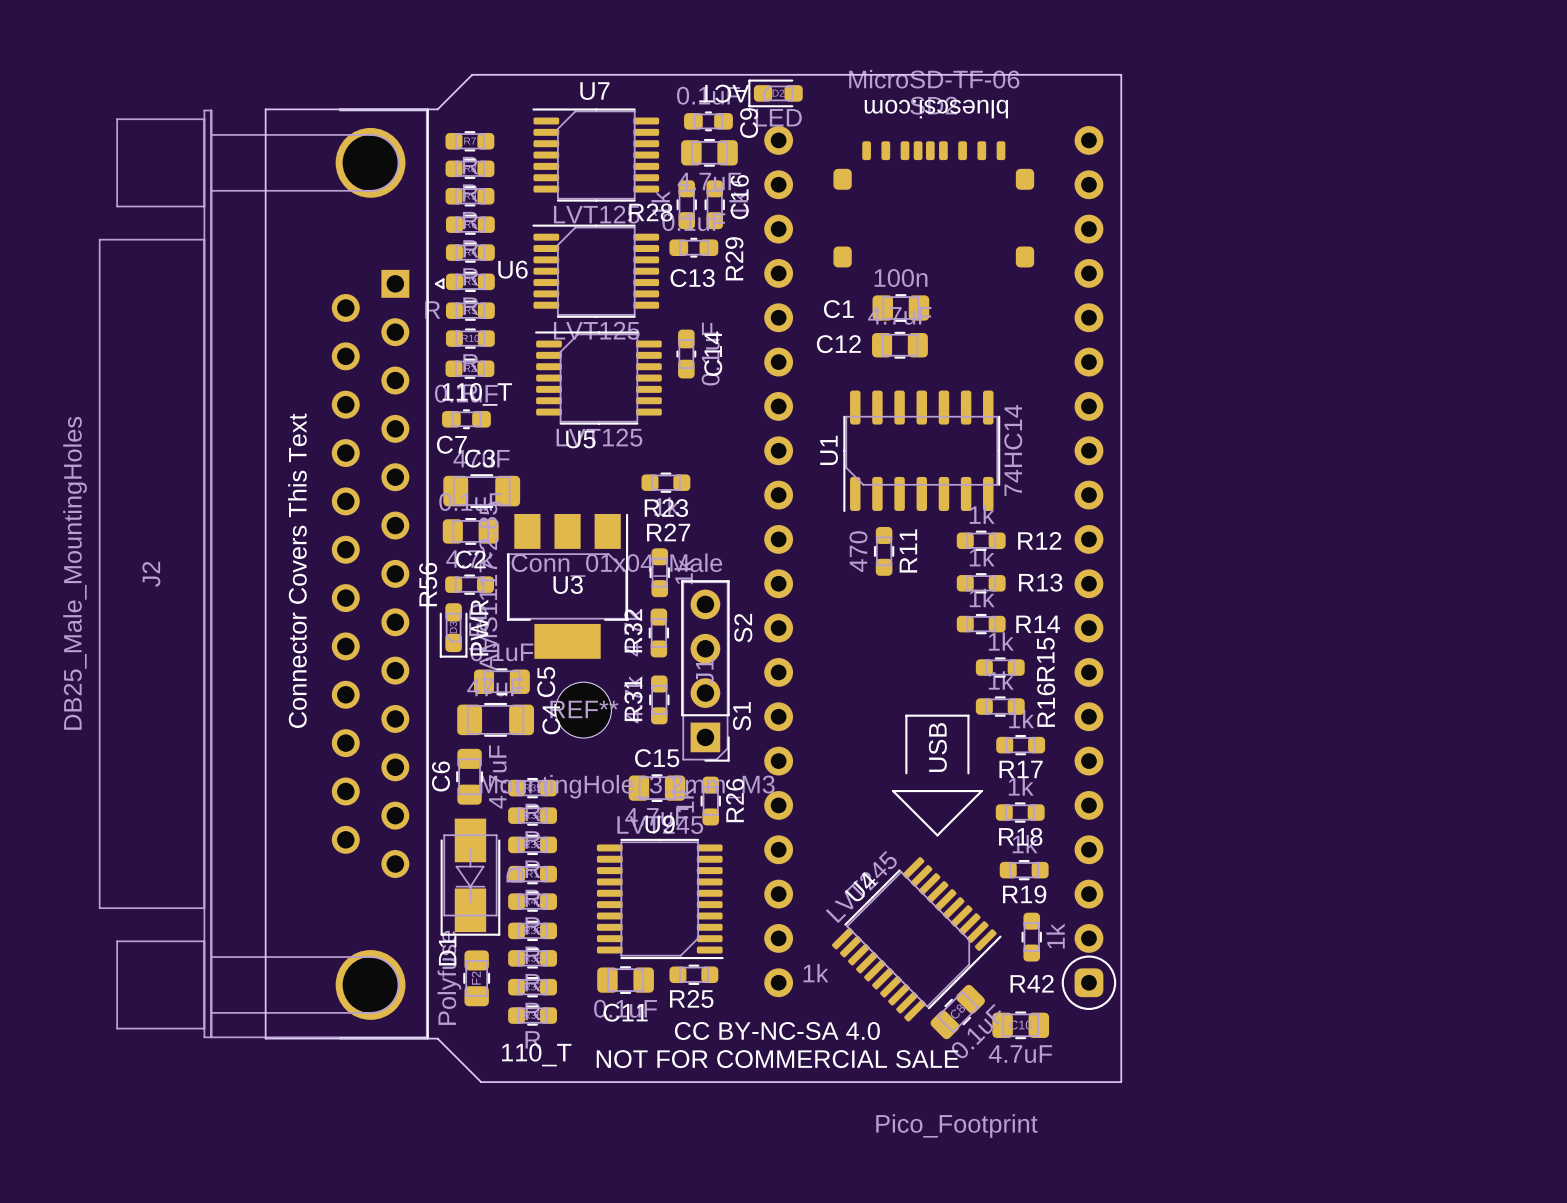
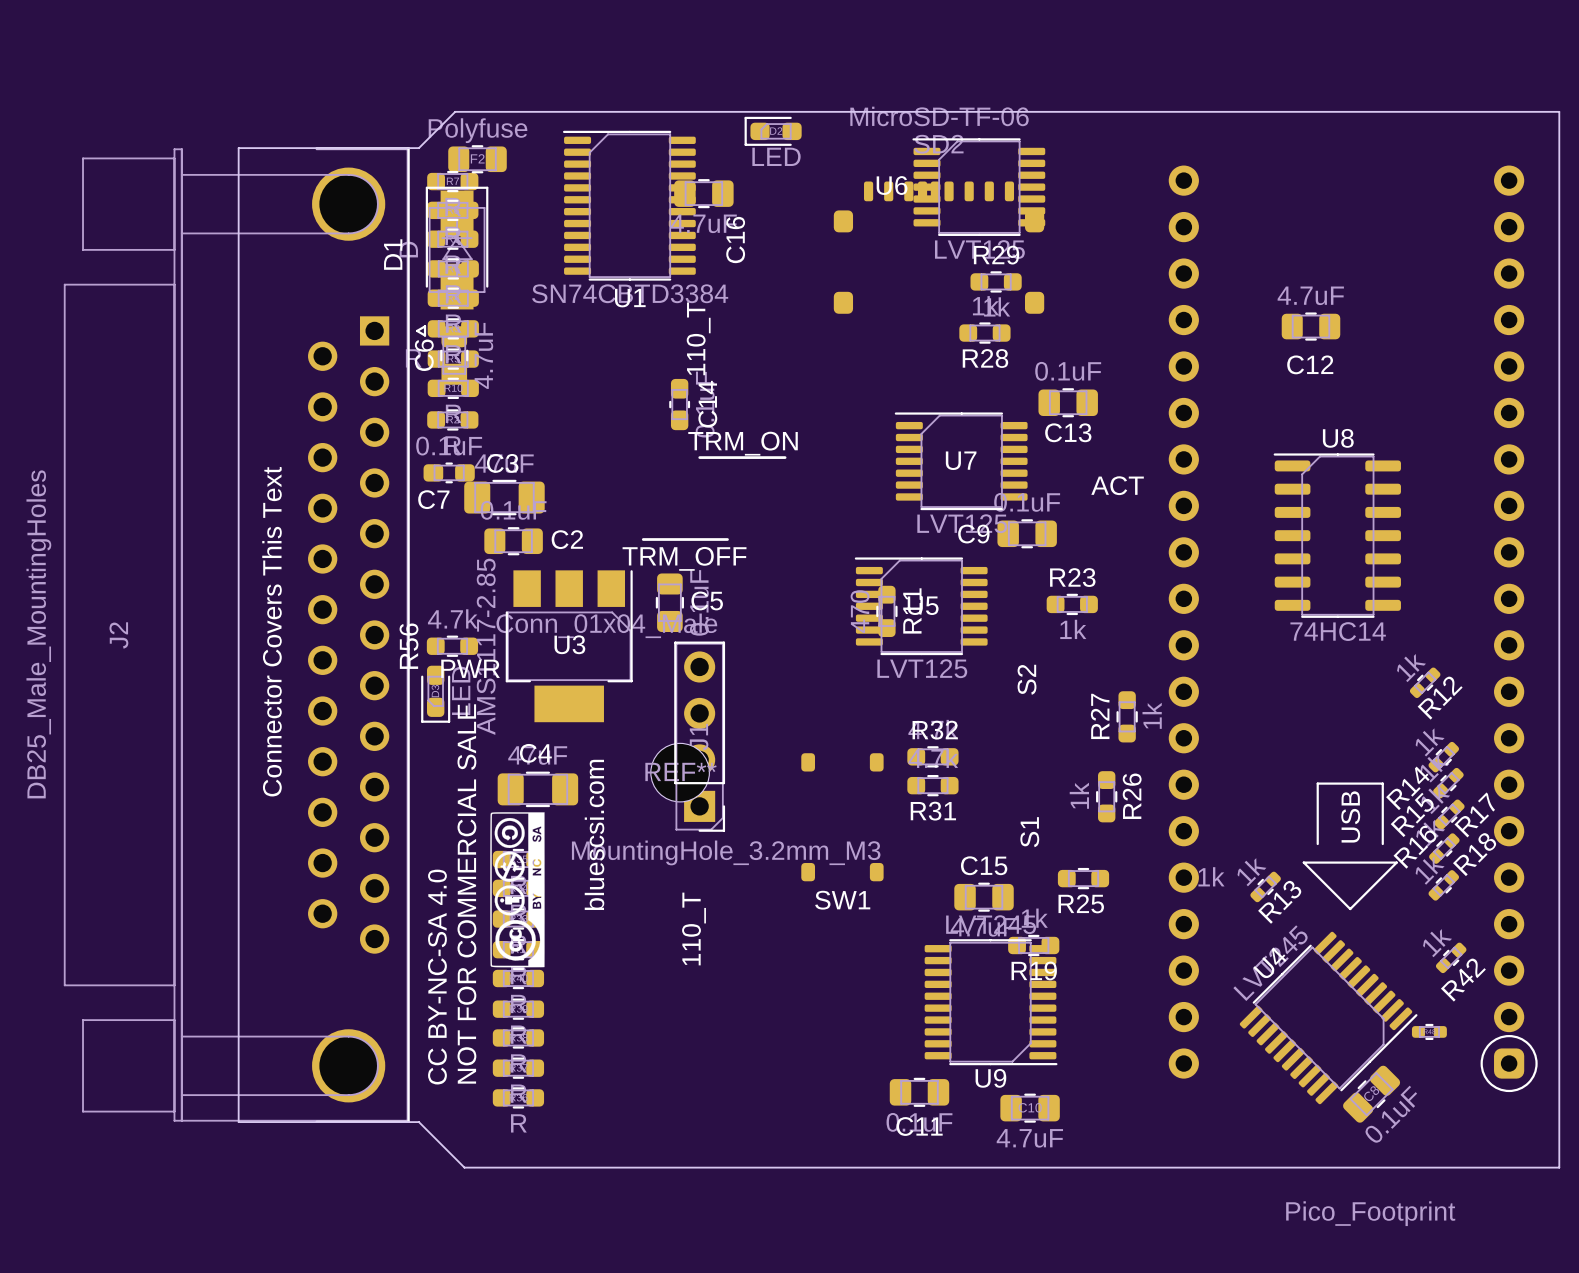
board edge: (1121, 74) (1121, 1082) -> (1135, 111) (1559, 111) (1559, 1167) (1135, 1167)
U7 name position: U7 (594, 91) -> U7 (961, 460)
text: ACT (724, 93) -> none
text: bluescsi.com (936, 109) -> none
C9 footprint: [684, 111, 733, 132] -> [997, 519, 1057, 549]
C9 name position: C9 (749, 123) -> C9 (973, 534)
U7 position: (595, 155) -> (961, 461)
R28 rotation: 0° (686, 204) -> 90° clockwise (984, 333)
R28 position: (686, 204) -> (984, 333)
R29 rotation: 0° (714, 204) -> 90° clockwise (996, 281)
R29 position: (714, 204) -> (996, 281)
R28 name position: R28 (650, 212) -> R28 (985, 358)
C13 footprint: [669, 237, 719, 258] -> [1038, 388, 1098, 418]
R29 name position: R29 (734, 258) -> R29 (996, 255)
U6 position: (595, 271) -> (978, 187)
C1: 100n (900, 308) -> none
C12 name position: C12 (838, 344) -> C12 (1310, 364)
C12 position: (899, 345) -> (1310, 326)
U5 position: (598, 378) -> (921, 606)
U1 footprint: [843, 390, 1001, 513] -> [562, 130, 696, 281]
text: none -> TRM_ON (743, 443)
text rotation: 0° (477, 394) -> 90° counterclockwise (698, 338)
text position: 110_T (477, 394) -> 110_T (698, 338)
line: none -> (699, 457) (785, 457)
text: none -> ACT (1117, 485)
U5 name position: U5 (580, 439) -> U5 (923, 605)
U1 name position: U1 (829, 450) -> U1 (630, 298)
U1 value: 74HC14 (1013, 450) -> SN74CBTD3384 (630, 293)
U8: none -> 74HC14 (1337, 535)
line: none -> (643, 539) (727, 539)
R23 position: (665, 482) -> (1072, 604)
C3 position: (481, 491) -> (504, 497)
text: none -> TRM_OFF (684, 558)
R23 name position: R23 (666, 508) -> R23 (1072, 577)
R12 footprint: [956, 530, 1006, 551] -> [1409, 667, 1441, 699]
C2 position: (470, 531) -> (513, 541)
R27 name rotation: 0° (668, 532) -> 90° counterclockwise (1100, 716)
R12 name position: R12 (1039, 540) -> R12 (1440, 698)
C2 name position: C2 (470, 559) -> C2 (567, 539)
part position: (940, 568) -> (1353, 628)
R27 position: (659, 572) -> (1127, 716)
R13 footprint: [956, 573, 1006, 594] -> [1250, 871, 1281, 903]
R13 name position: R13 (1040, 582) -> R13 (1279, 902)
U3 position: (567, 586) -> (569, 646)
R14 footprint: [956, 613, 1006, 635] -> [1428, 741, 1460, 773]
R14 name position: R14 (1038, 624) -> R14 (1407, 788)
text rotation: 0° (479, 627) -> 90° clockwise (470, 668)
text position: S2 (743, 628) -> S2 (1027, 679)
R32 rotation: 0° (658, 633) -> 90° clockwise (932, 756)
R32 position: (658, 633) -> (932, 756)
R15 footprint: [975, 657, 1025, 678] -> [1433, 767, 1464, 799]
R15 name position: R15 (1045, 659) -> R15 (1412, 814)
C5 rotation: 0° (501, 681) -> 90° clockwise (669, 602)
C5 position: (501, 681) -> (669, 602)
R16 footprint: [975, 696, 1025, 717] -> [1434, 799, 1465, 831]
R31 name position: R31 (633, 699) -> R31 (933, 811)
R31 rotation: 0° (659, 699) -> 90° clockwise (932, 785)
R31 position: (659, 699) -> (932, 785)
R16 name position: R16 (1046, 705) -> R16 (1415, 846)
REF** position: (583, 710) -> (680, 772)
text position: S1 (742, 716) -> S1 (1029, 832)
C4 position: (495, 719) -> (537, 789)
C4 name rotation: 0° (551, 719) -> 90° clockwise (535, 753)
R17 footprint: [996, 734, 1046, 756] -> [1429, 833, 1460, 864]
drawing: none -> [490, 812, 545, 968]
SW1: none -> (842, 817)
text: none -> bluescsi.com (594, 834)
R17 name position: R17 (1021, 769) -> R17 (1474, 814)
C6 position: (469, 776) -> (454, 355)
C15 position: (657, 788) -> (984, 897)
R26 position: (710, 801) -> (1106, 796)
R18 footprint: [995, 802, 1045, 823] -> [1428, 870, 1460, 901]
U9 name position: U9 (660, 824) -> U9 (990, 1078)
R18 name position: R18 (1020, 836) -> R18 (1474, 854)
D1 rotation: 0° (470, 877) -> 180° (457, 248)
D1 position: (470, 877) -> (457, 248)
U9 position: (660, 898) -> (991, 1002)
R42 footprint: [1021, 912, 1042, 962] -> [1435, 942, 1467, 974]
R42 value position: 1k (1055, 936) -> 1k (1437, 943)
U4 position: (916, 939) -> (1328, 1017)
D1 name position: D1 (447, 950) -> D1 (393, 254)
part: none -> (1429, 1031)
R25 position: (693, 974) -> (1083, 878)
F2 rotation: 0° (476, 978) -> 90° clockwise (477, 159)
F2 position: (476, 978) -> (477, 159)
C11 position: (625, 980) -> (919, 1092)
C8 position: (957, 1012) -> (1371, 1094)
text rotation: 0° (777, 1031) -> 90° counterclockwise (437, 977)
text position: CC BY-NC-SA 4.0 (777, 1031) -> CC BY-NC-SA 4.0 (437, 977)
text rotation: 0° (536, 1054) -> 90° counterclockwise (694, 928)
text position: 110_T (536, 1054) -> 110_T (694, 928)
text rotation: 0° (777, 1059) -> 90° counterclockwise (466, 893)

